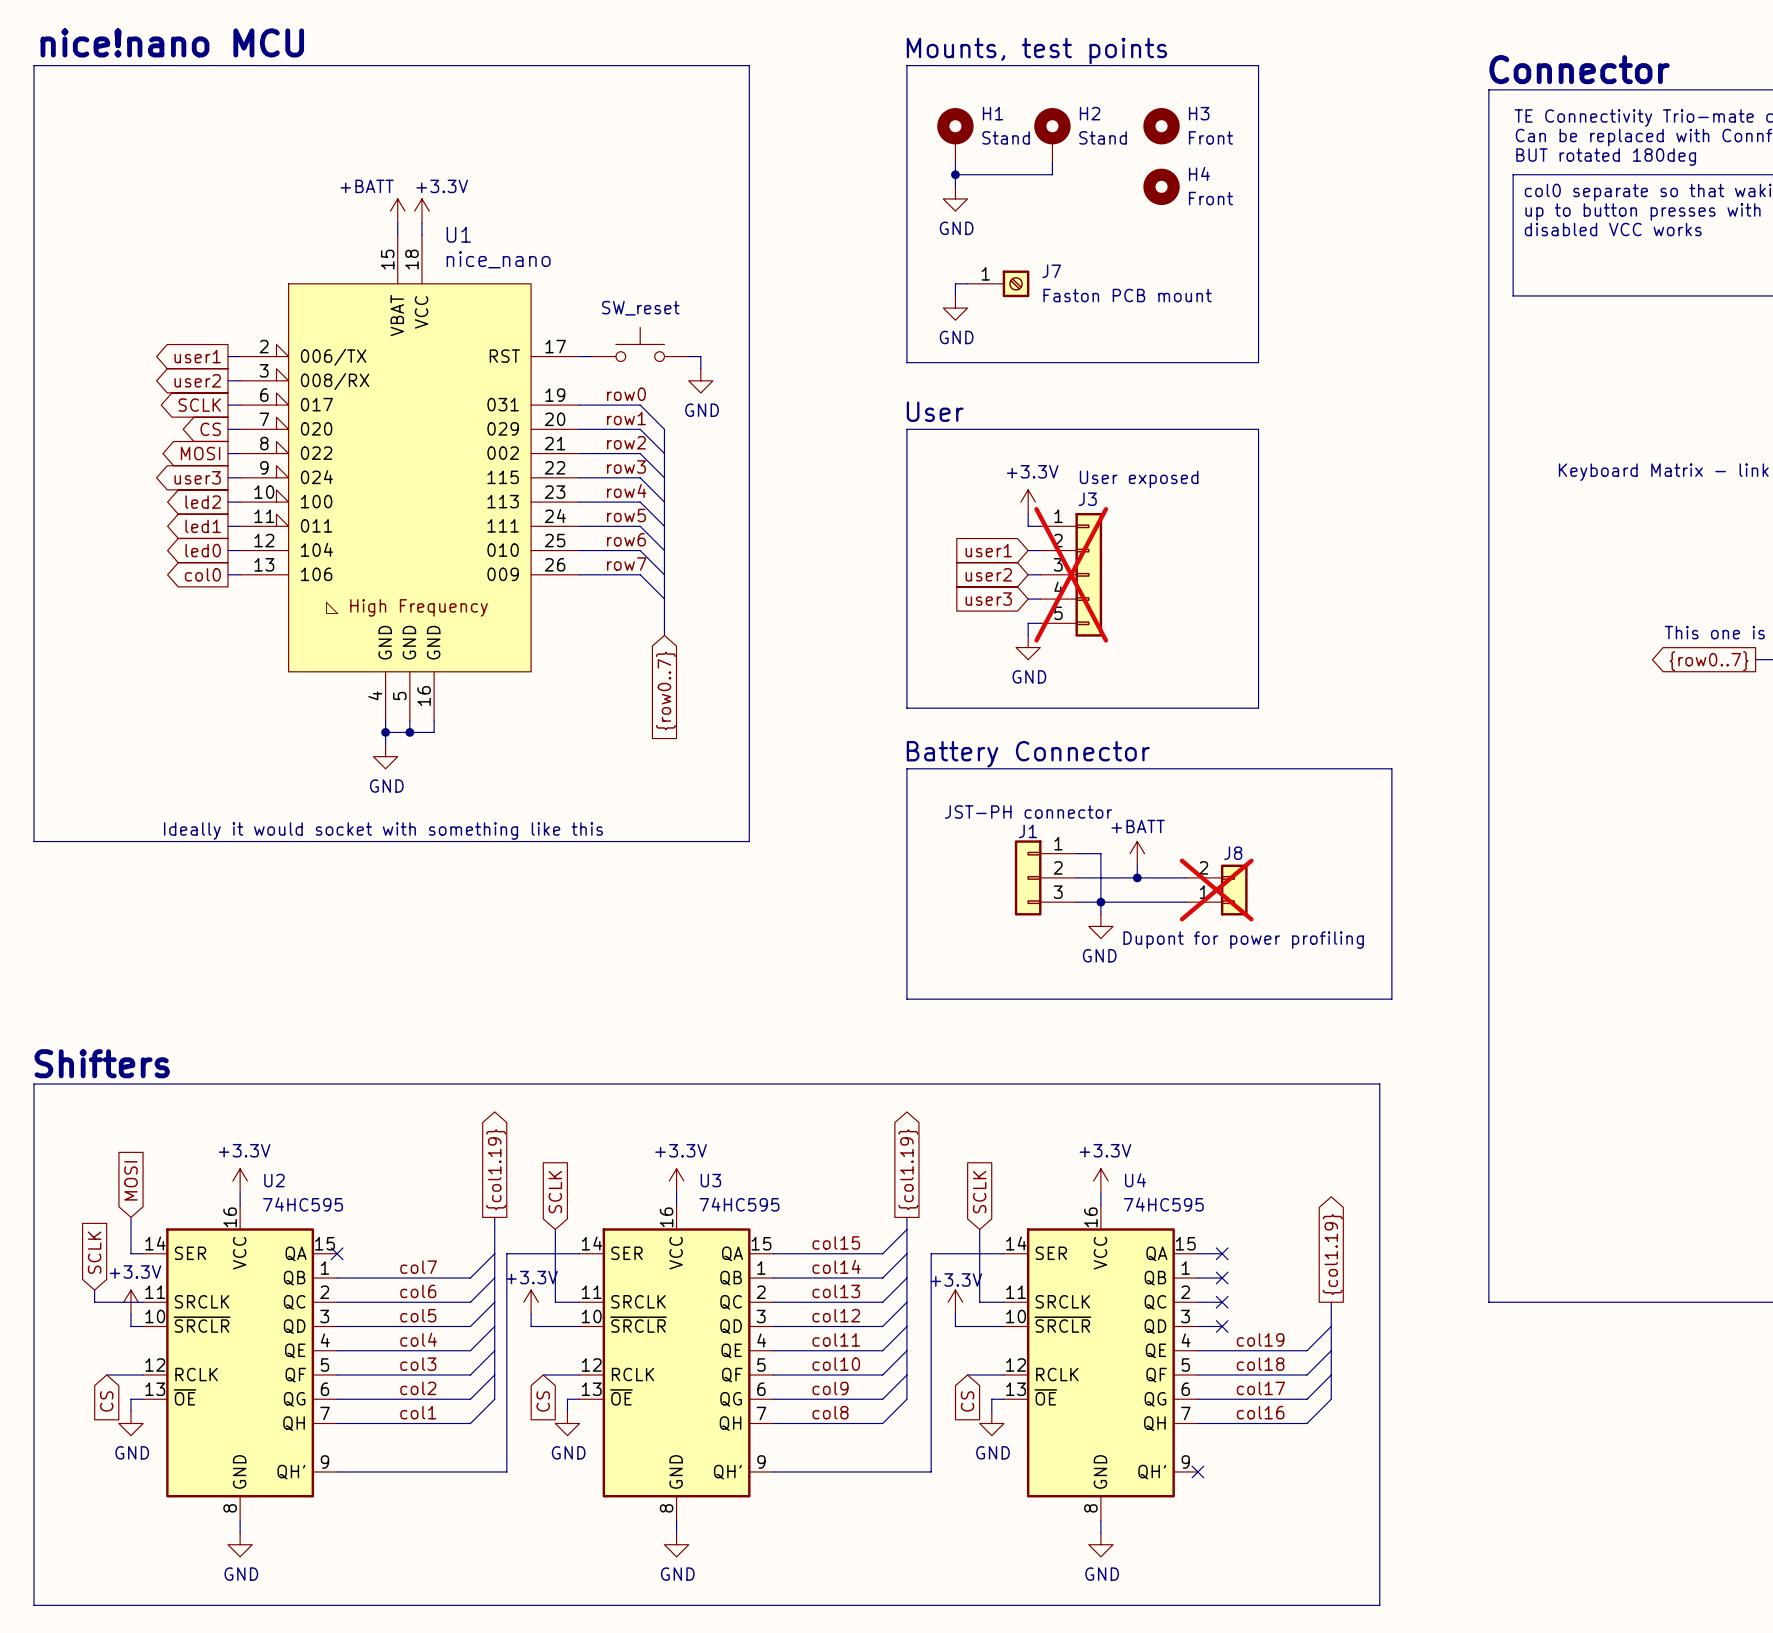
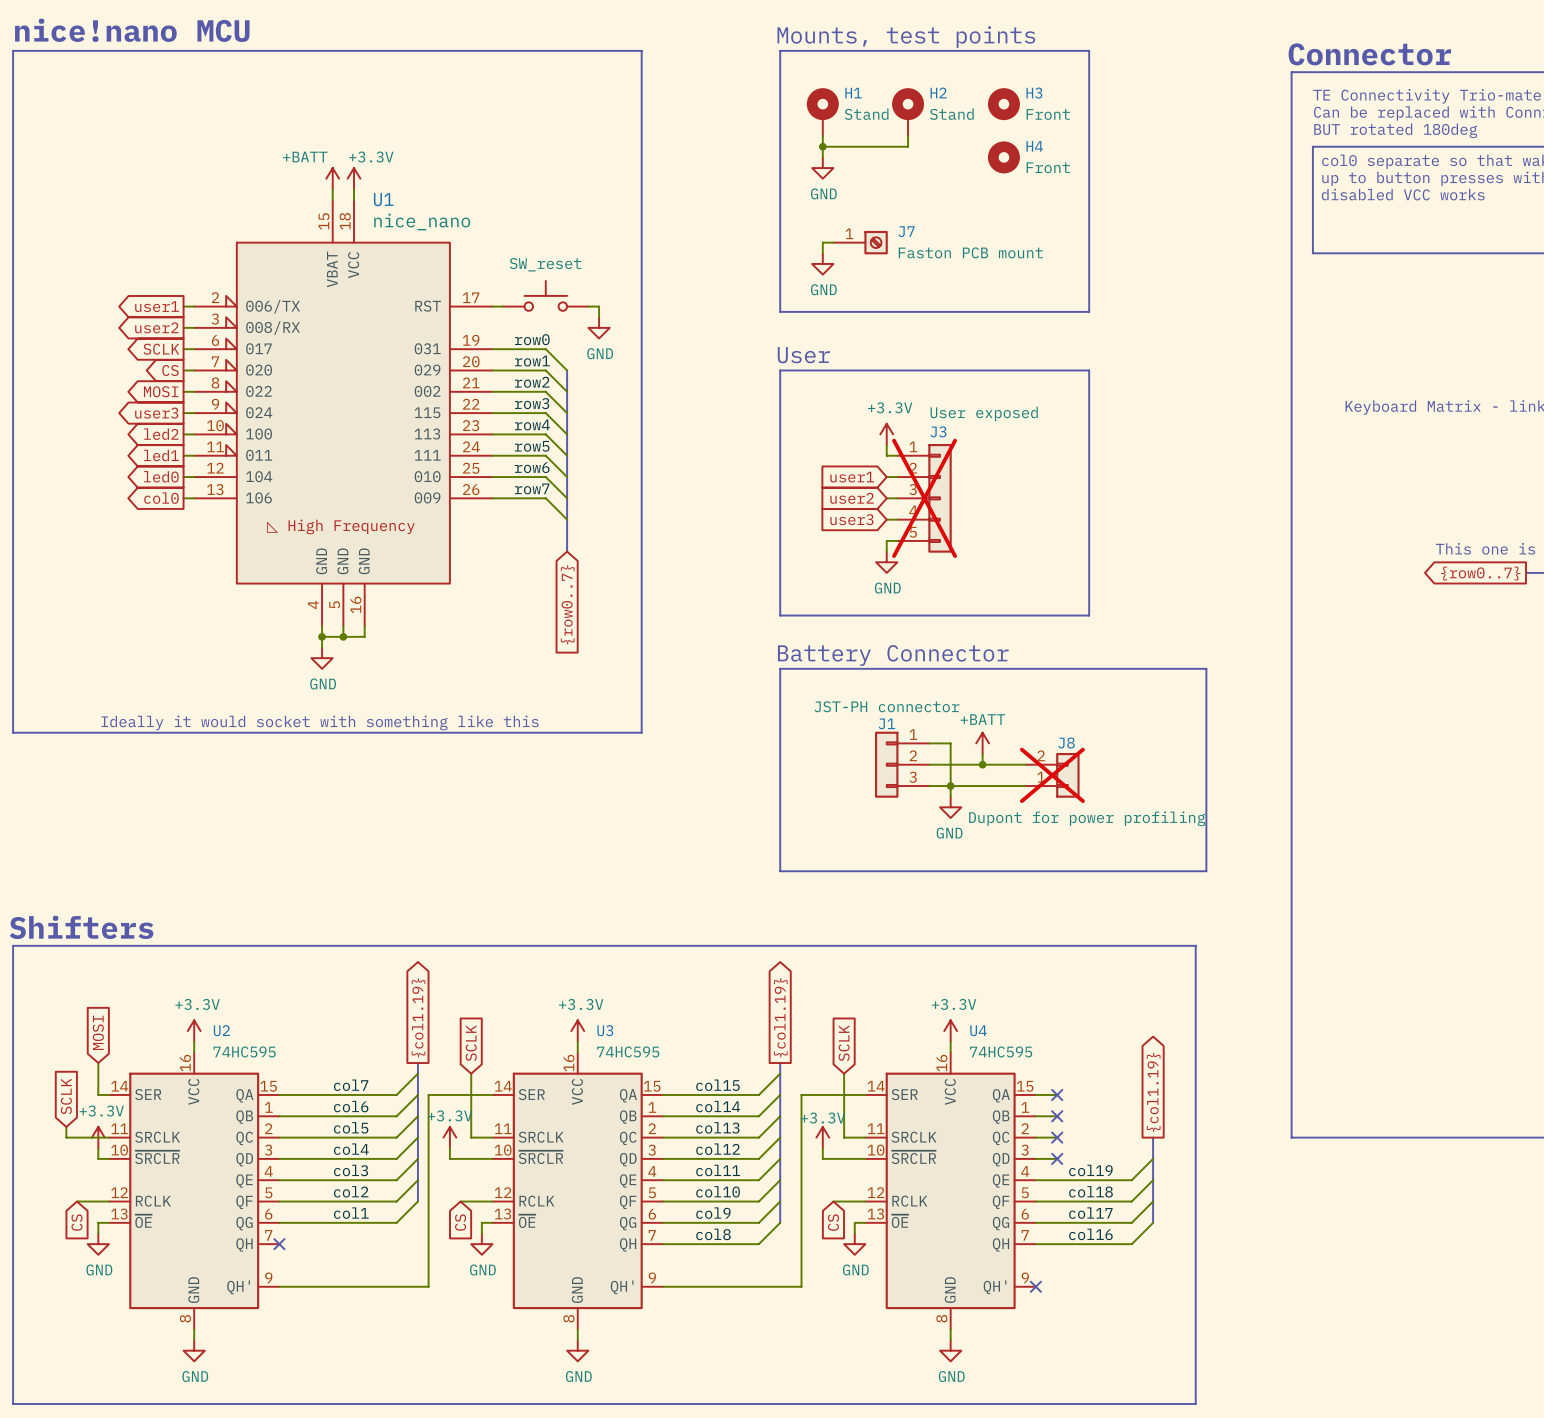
label: none -> col7 (351, 1085)
no-connect mark: (337, 1253) -> none
label: col7 (418, 1267) -> col6 (351, 1106)
label: col6 (418, 1291) -> col5 (351, 1127)
label: col5 (418, 1315) -> col4 (351, 1149)
label: col4 (418, 1339) -> col3 (351, 1170)
label: col3 (418, 1364) -> col2 (351, 1191)
bus: (494, 1374) (494, 1399) -> none
label: col2 (418, 1388) -> col1 (351, 1213)
wire: (494, 1399) (470, 1423) (337, 1423) -> (417, 1073) (396, 1094) (279, 1094)
label: col1 (418, 1412) -> none
no-connect mark: none -> (279, 1244)

